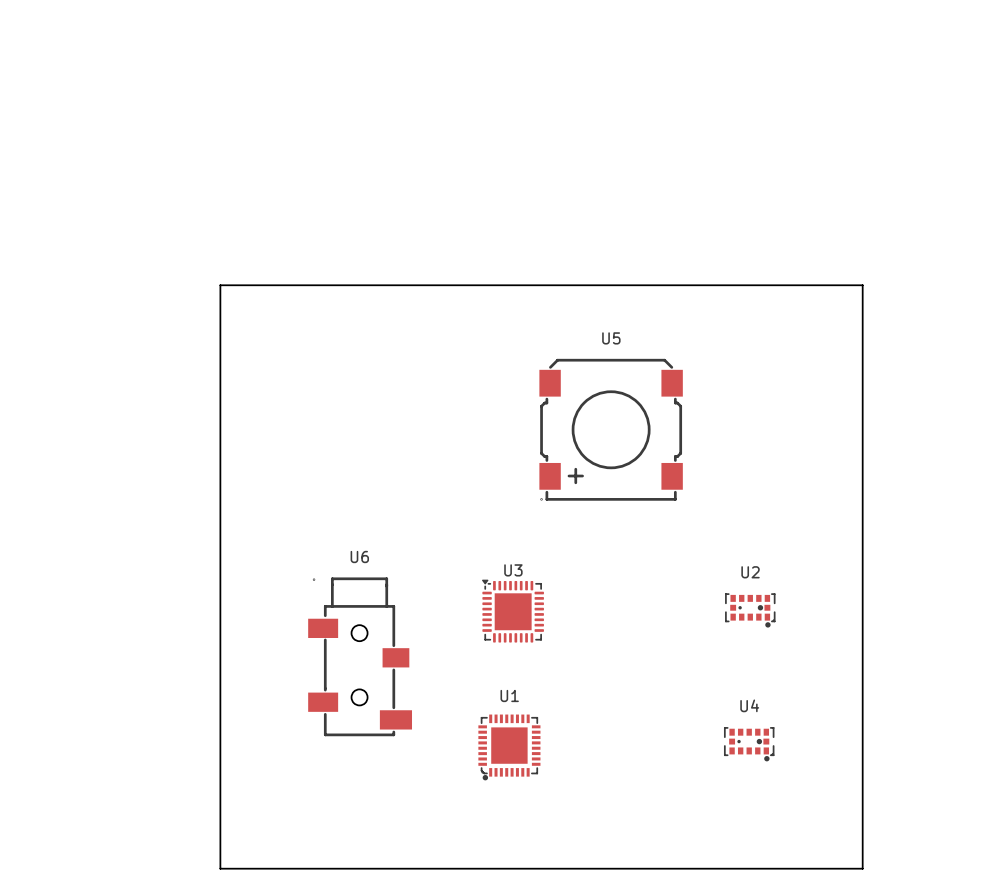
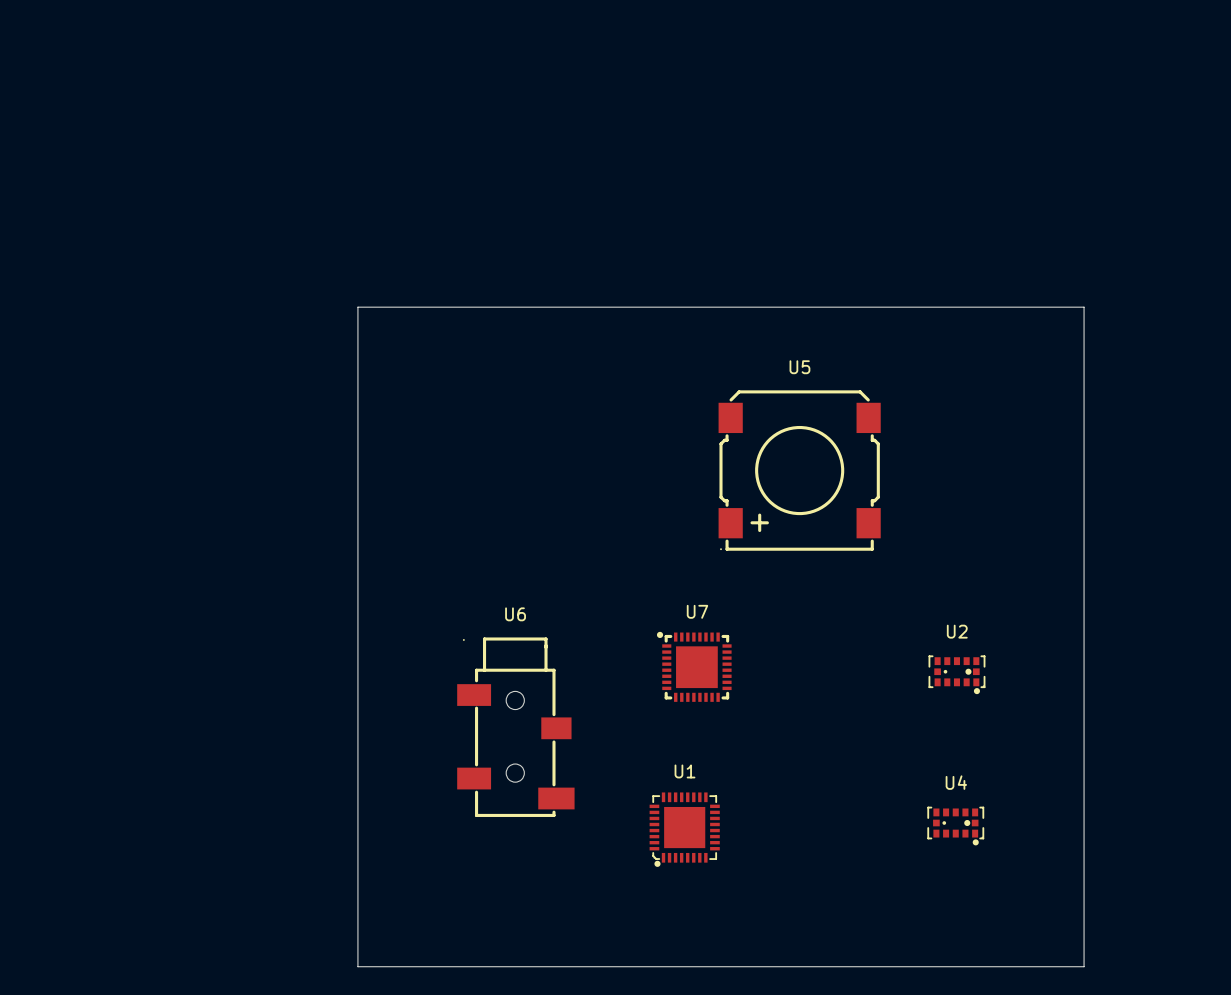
U7: none -> (694, 666)
U3: (512, 611) -> none

